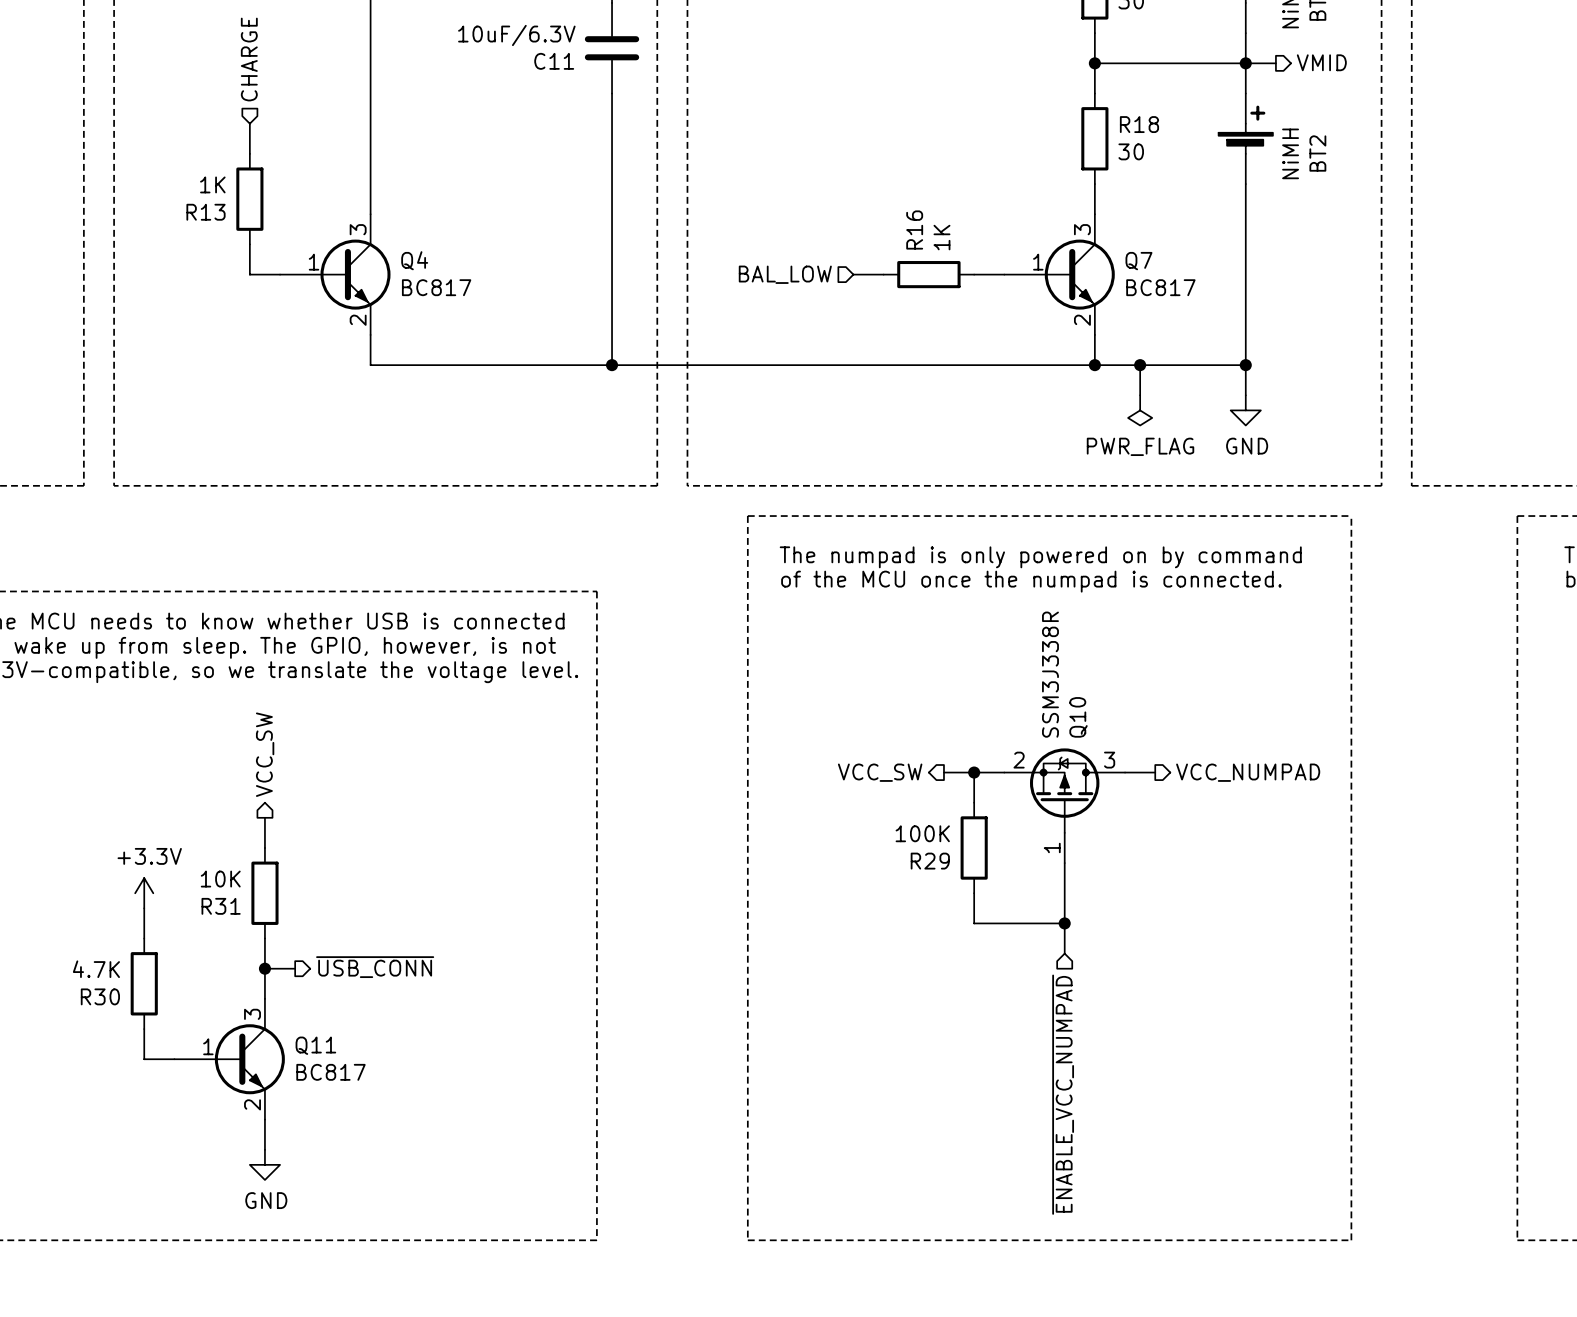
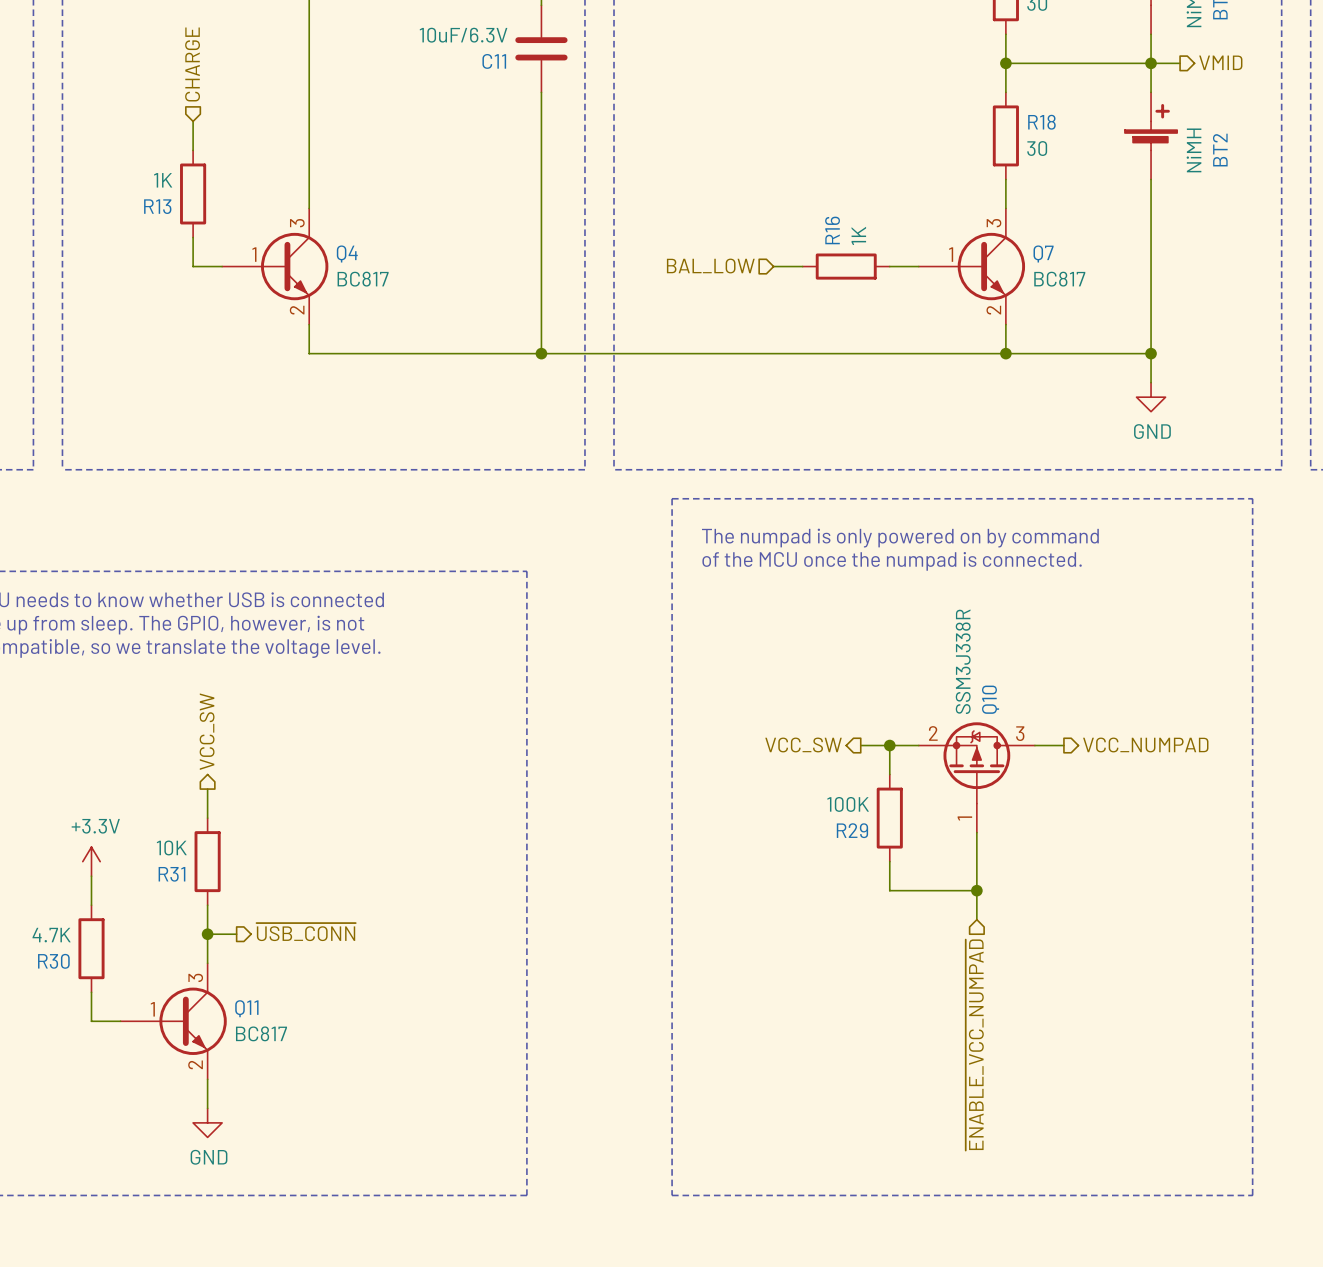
wire: (1140, 365) (1140, 395) -> none
junction: (1140, 365) -> none
power symbol: PWR_FLAG (1140, 410) -> none

